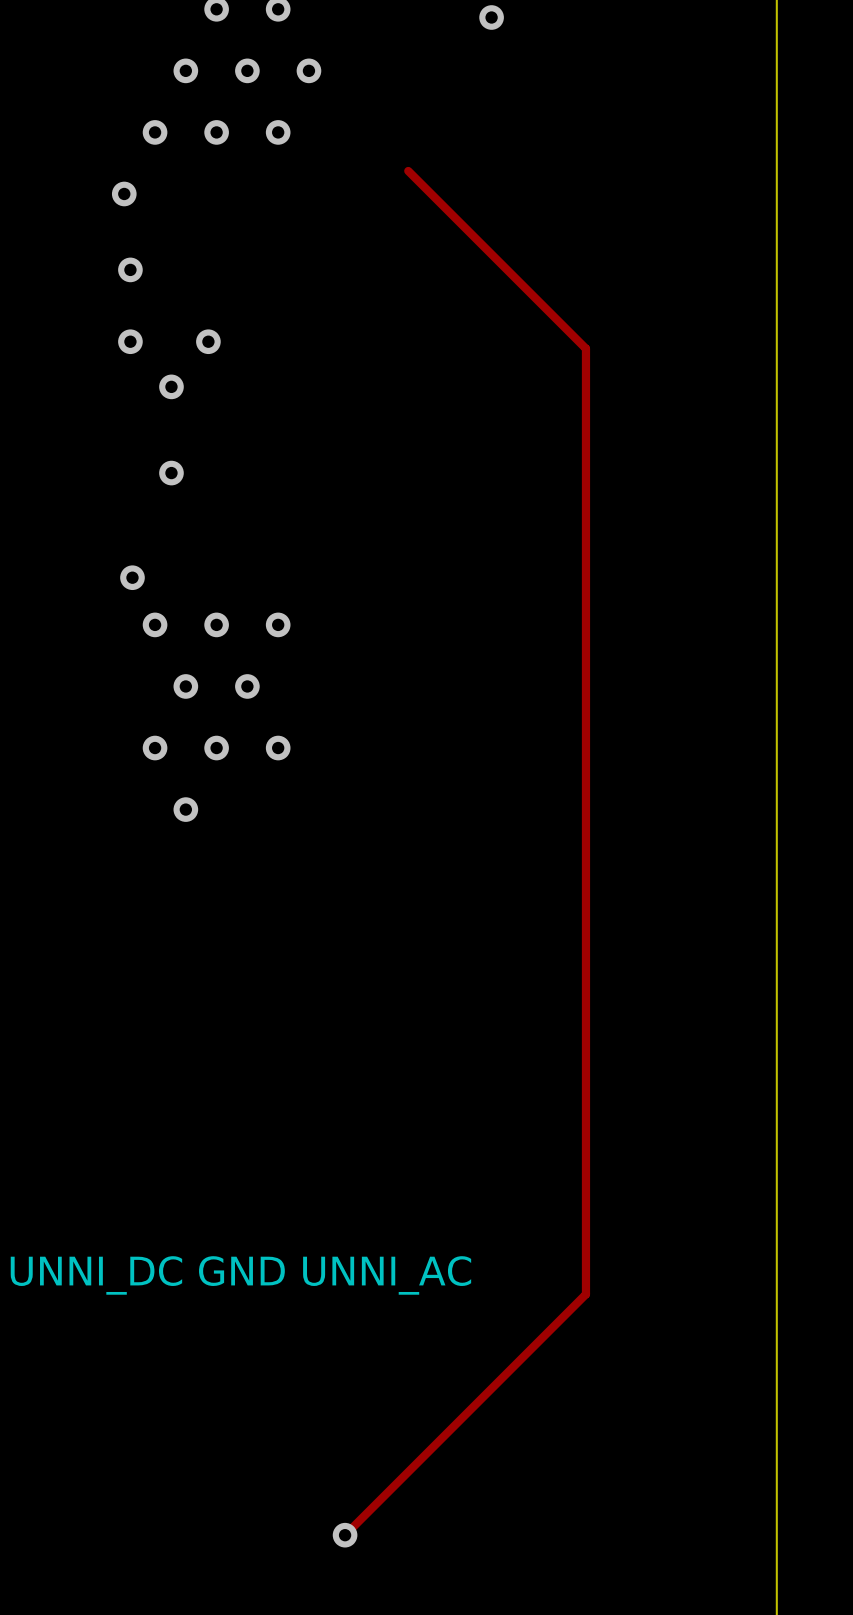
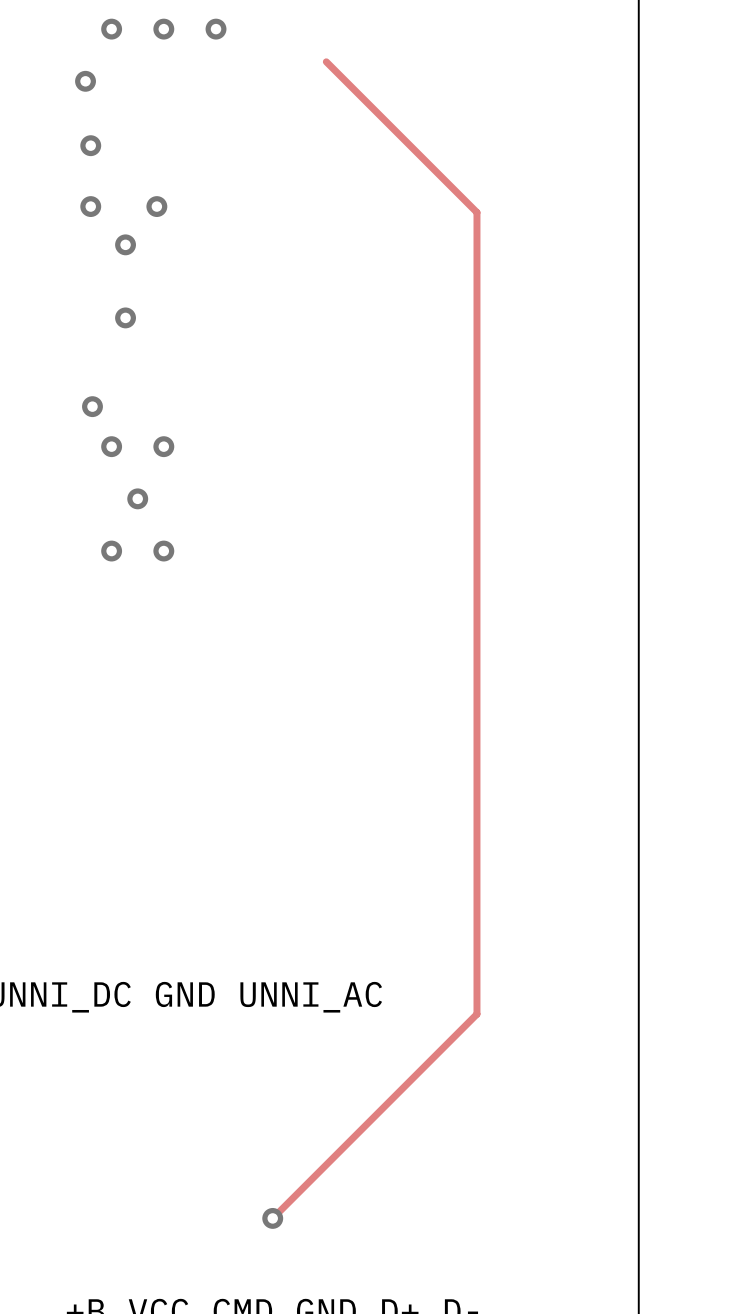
via: (278, 624) -> none
via: (247, 686) -> none
via: (278, 748) -> none
via: (185, 809) -> none

